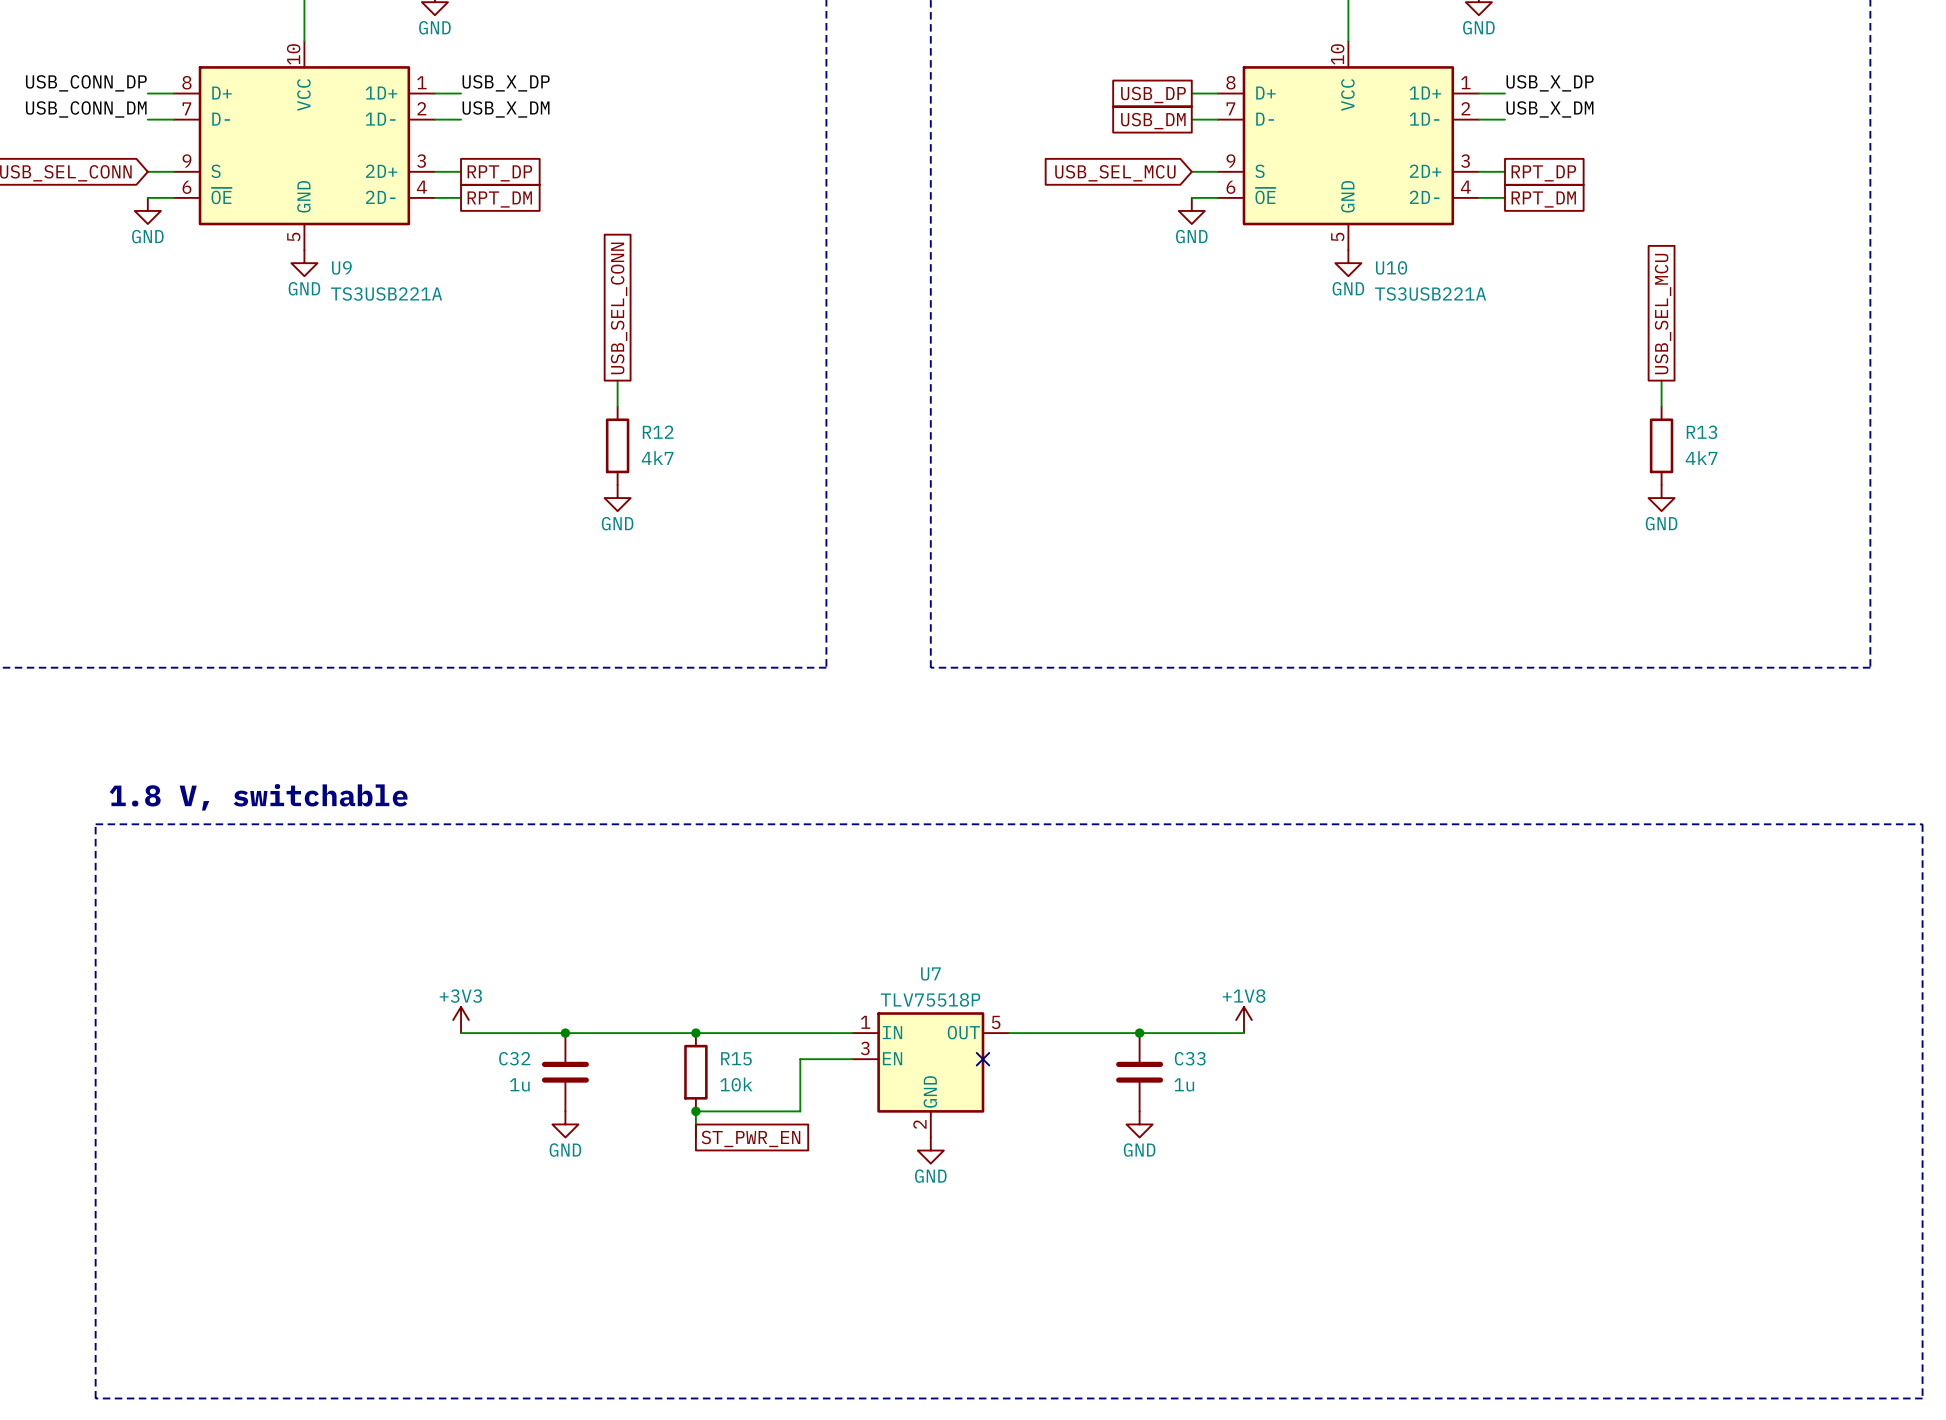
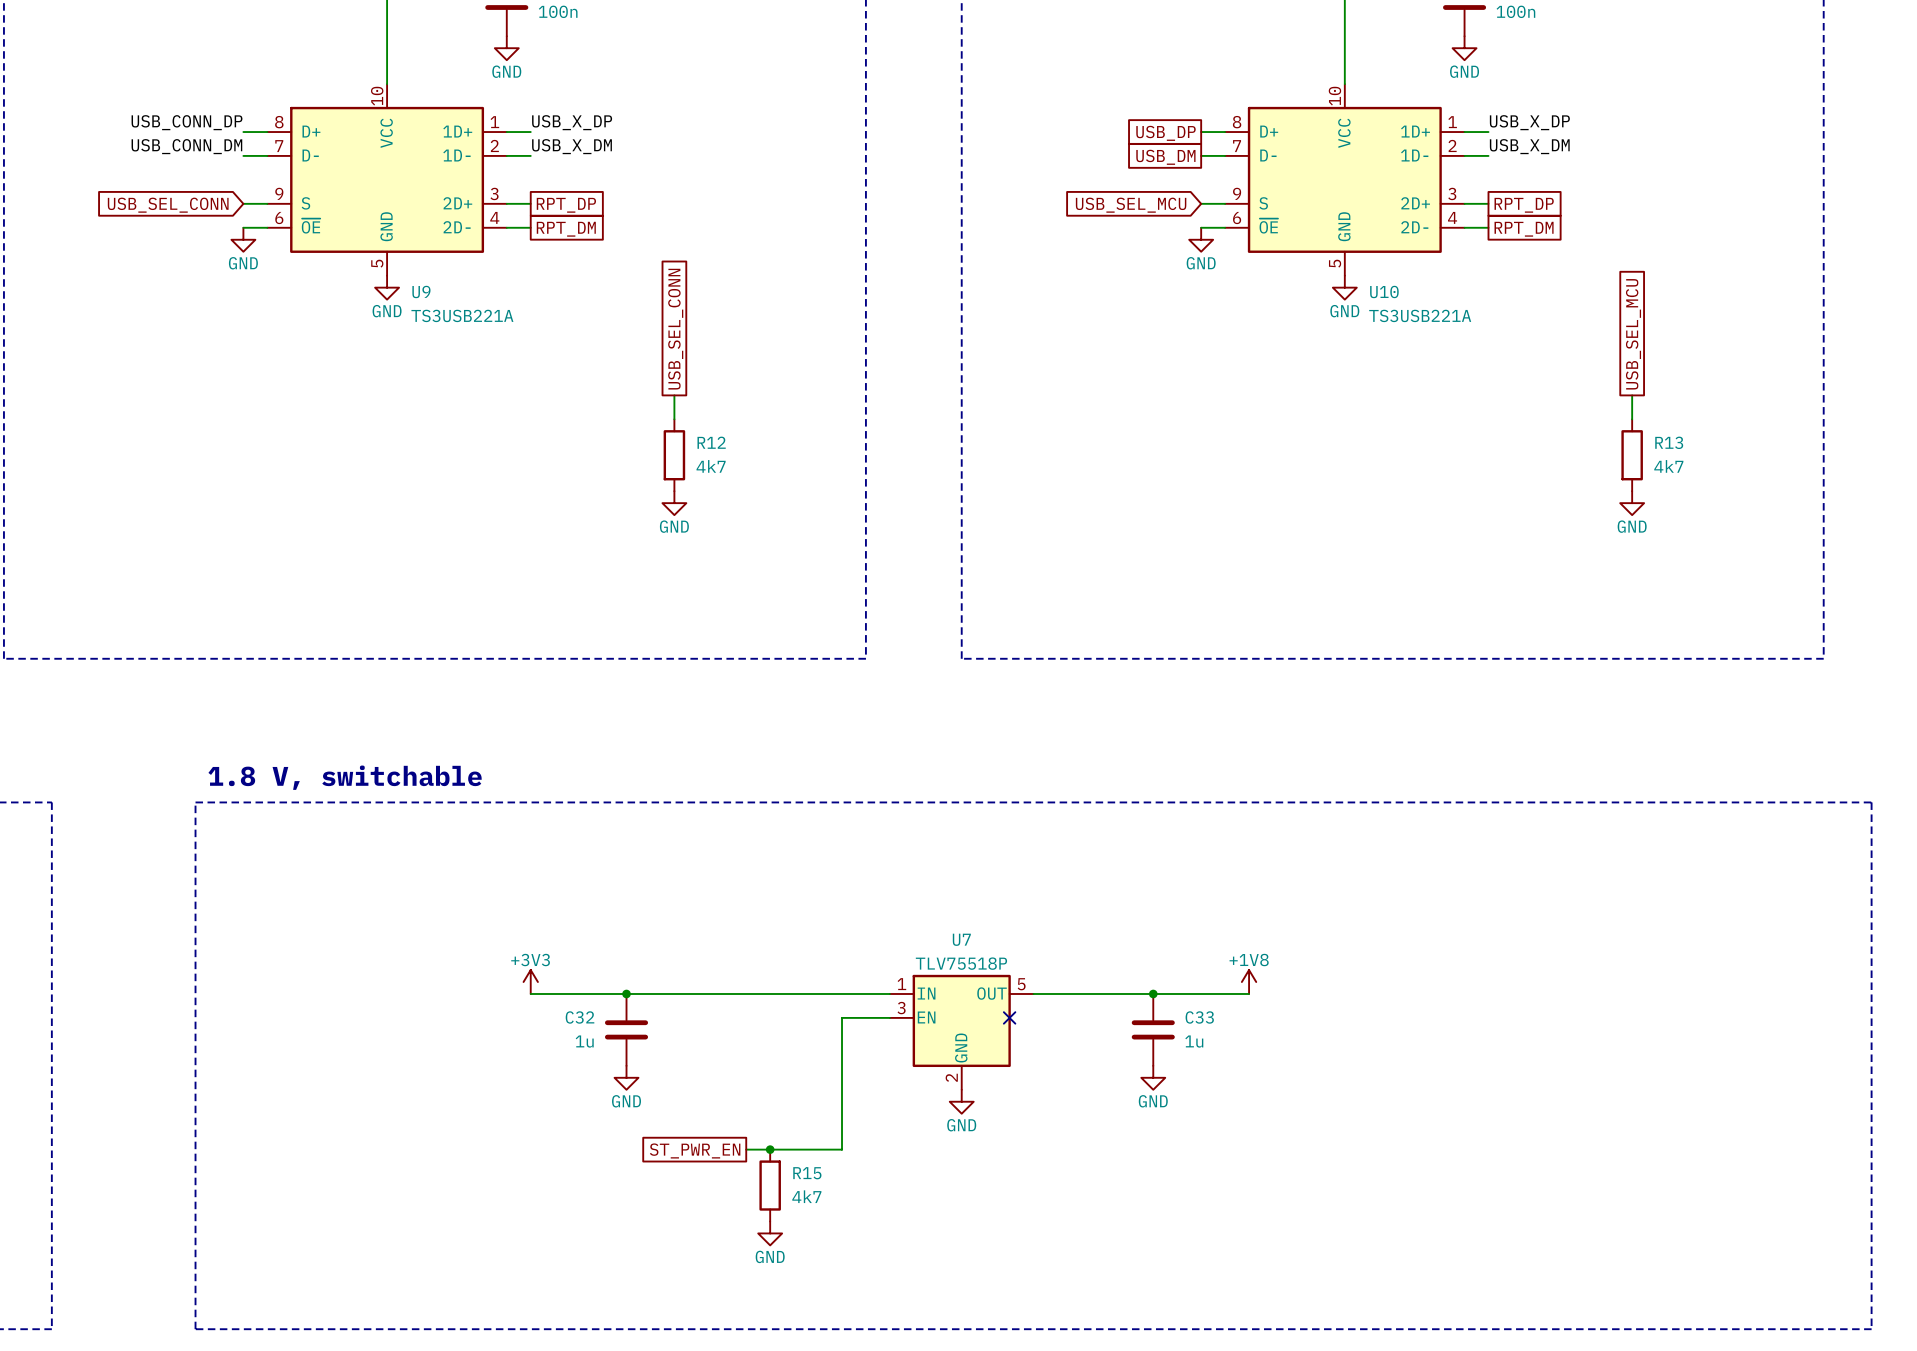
junction: (695, 1033) -> none
R15 position: (695, 1072) -> (770, 1185)
R15 value: 10k (736, 1084) -> 4k7 (806, 1196)
junction: (695, 1111) -> none
wire: (800, 1111) (695, 1111) (695, 1137) -> (842, 1065) (842, 1149) (746, 1149)
global label rotation: 0° (750, 1138) -> 180° (695, 1150)
global label position: ST_PWR_EN (750, 1138) -> ST_PWR_EN (695, 1150)
junction: none -> (770, 1149)
power symbol: none -> GND (770, 1233)

